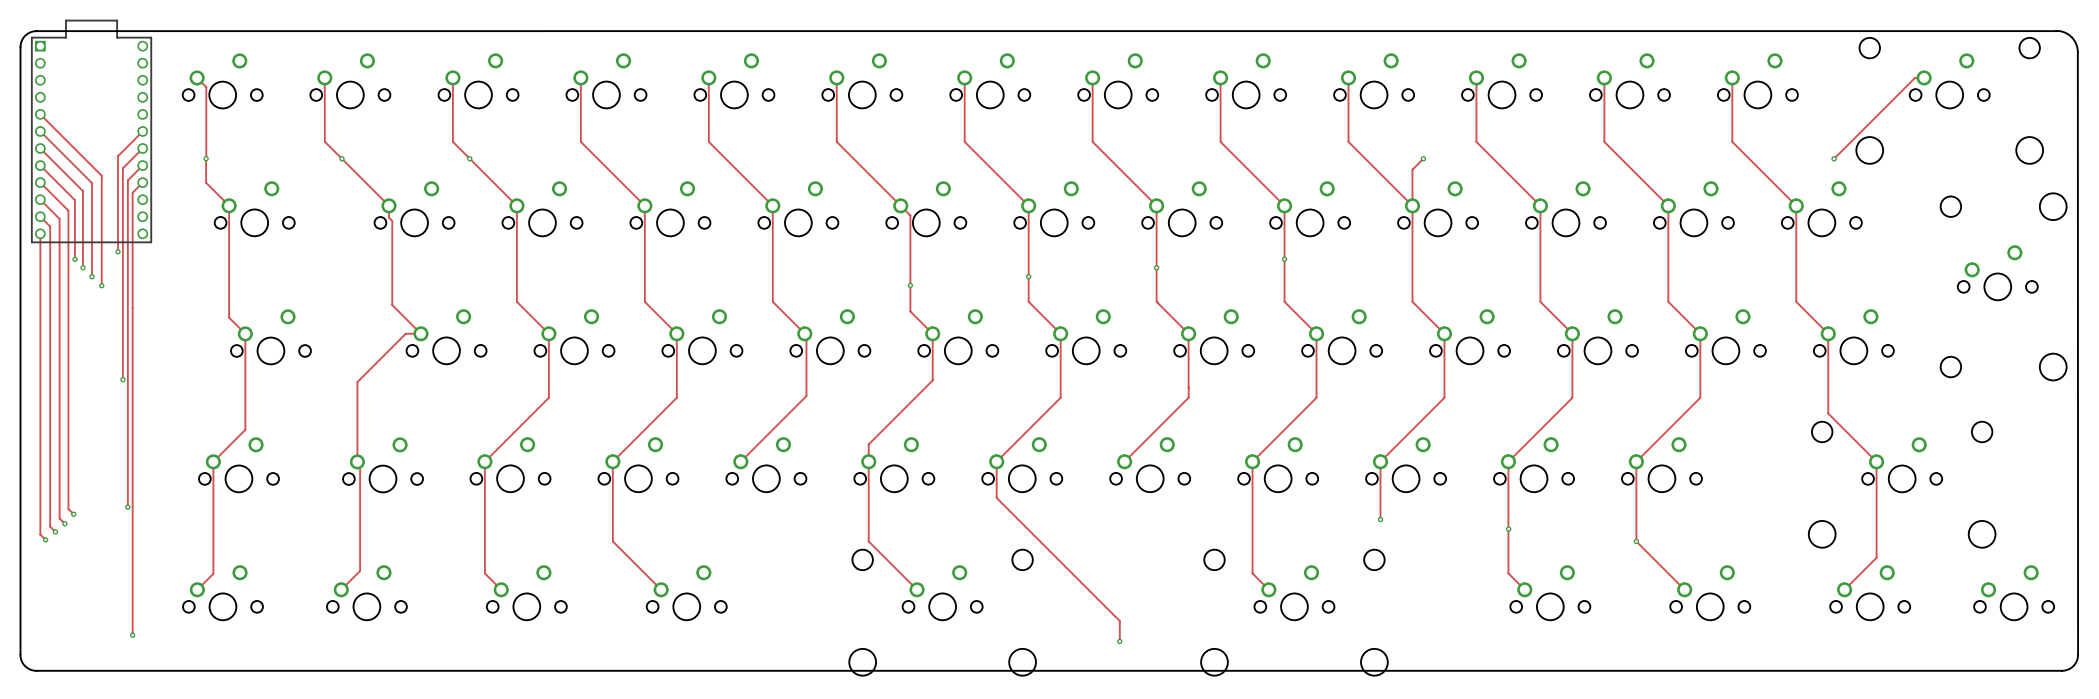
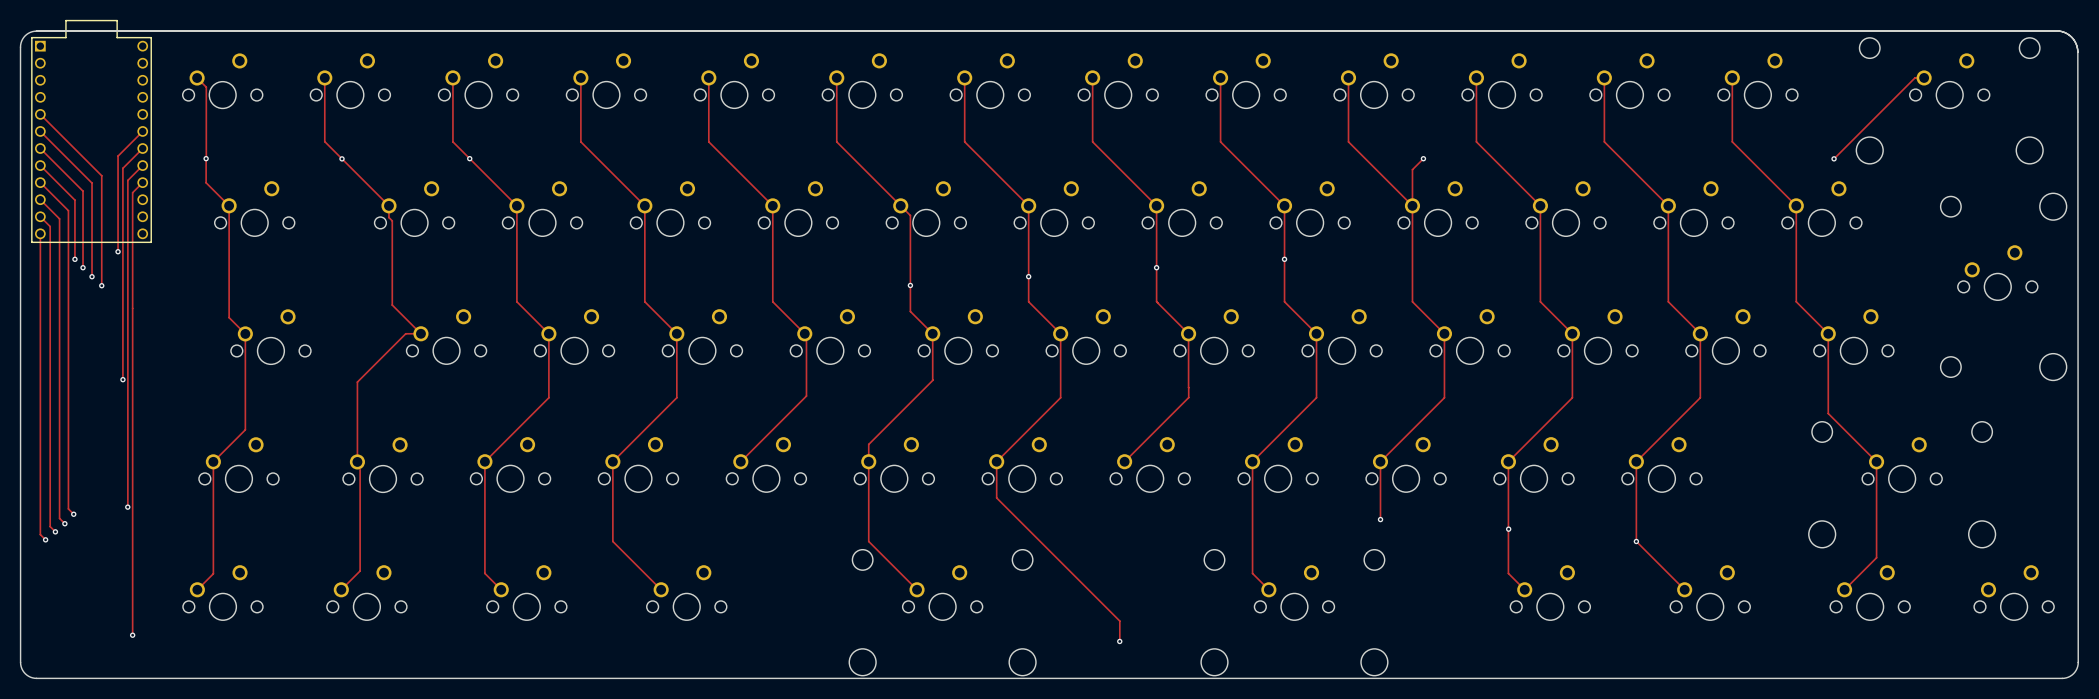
board edge: (20, 47) (20, 654) -> (20, 47) (20, 662) (23, 672) (32, 677) (2062, 678) (2071, 675) (2077, 666) (2077, 52) (2073, 39) (2062, 31) (36, 31)
board edge: (2077, 52) (2078, 654) (2074, 664) (2066, 670) (36, 670) (25, 666) (20, 654) -> none

